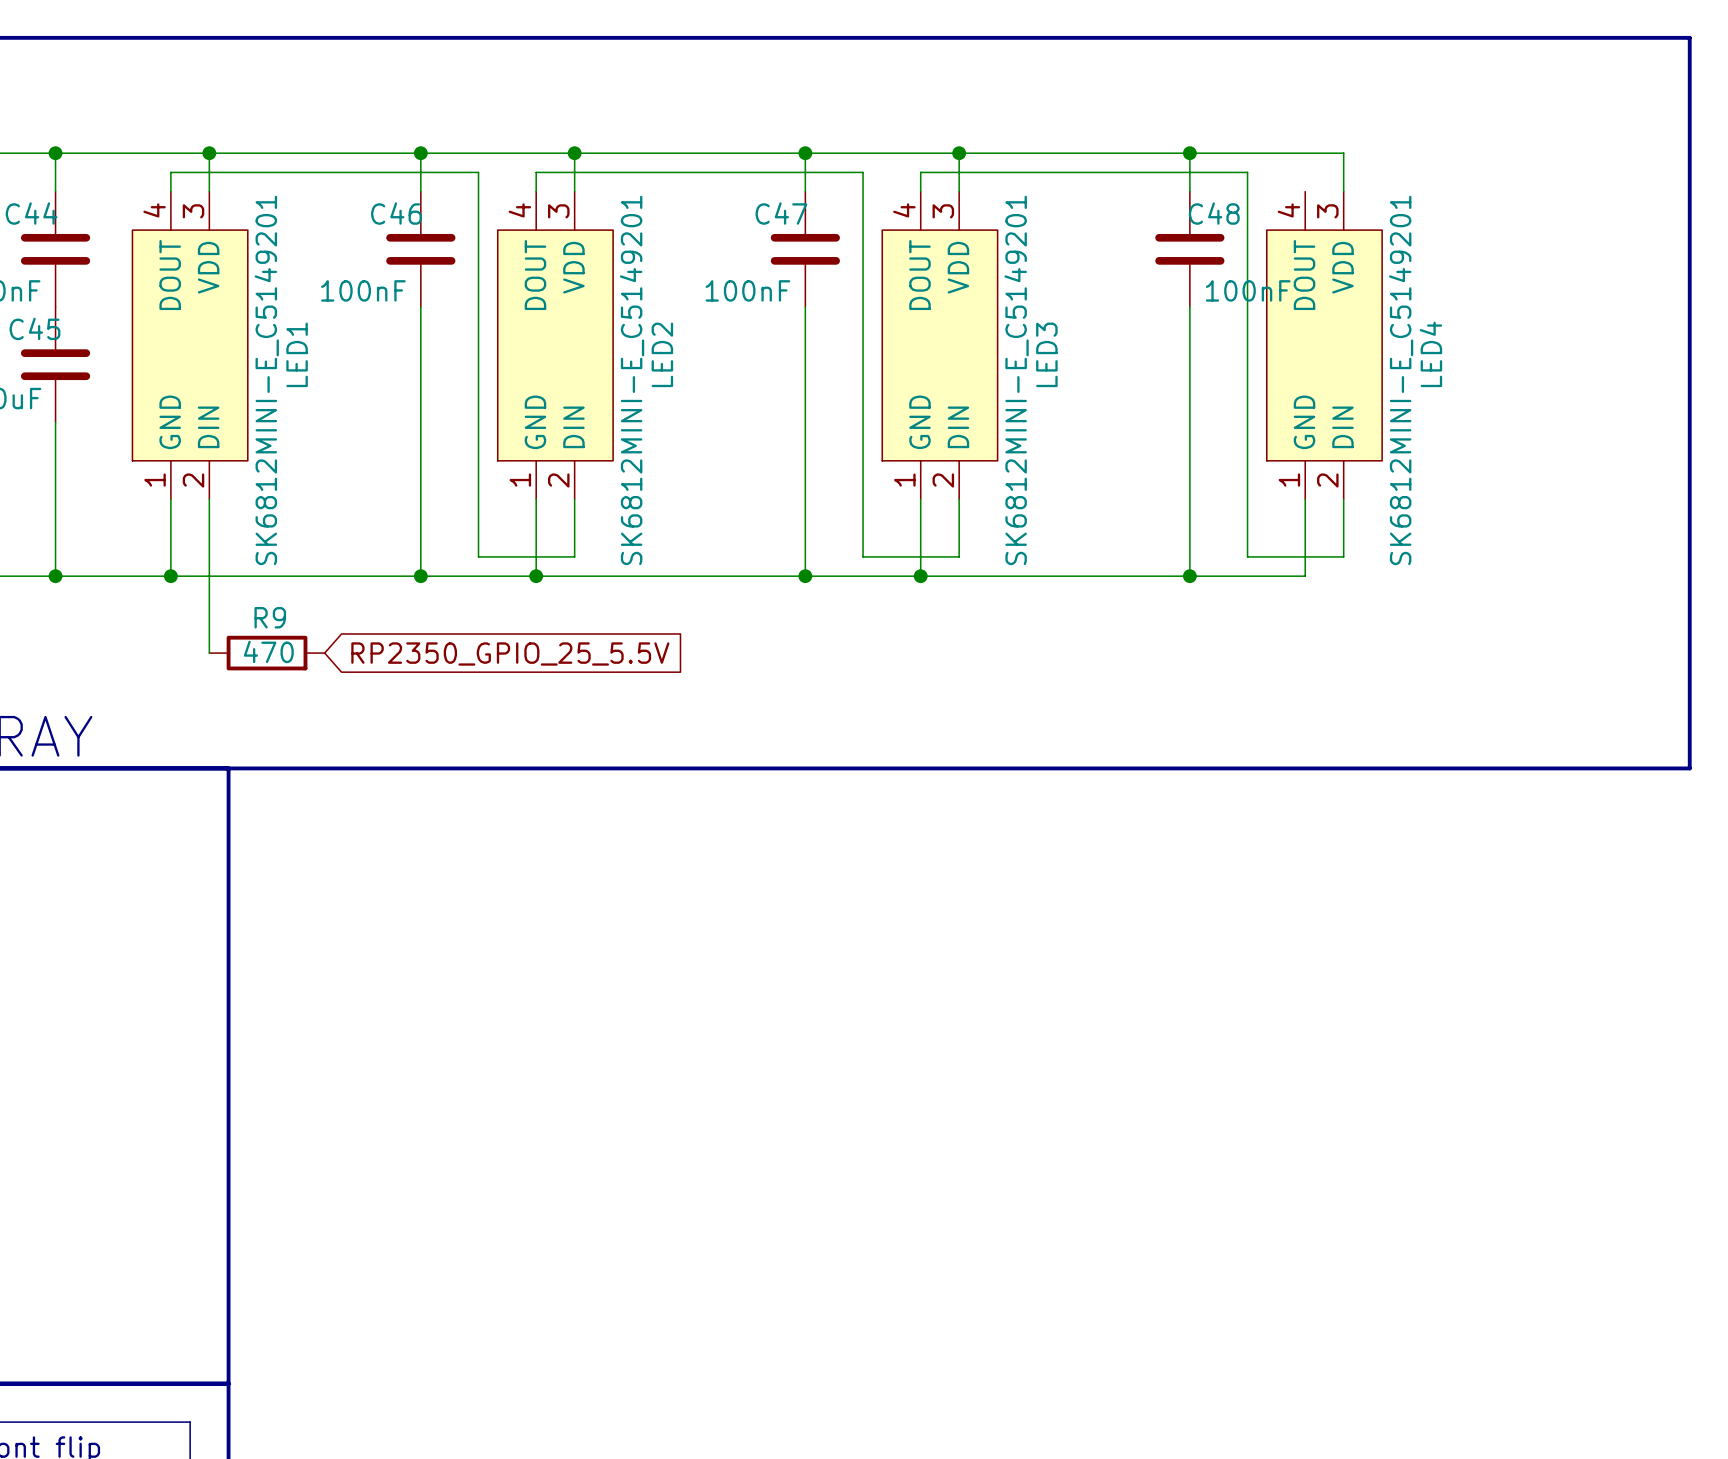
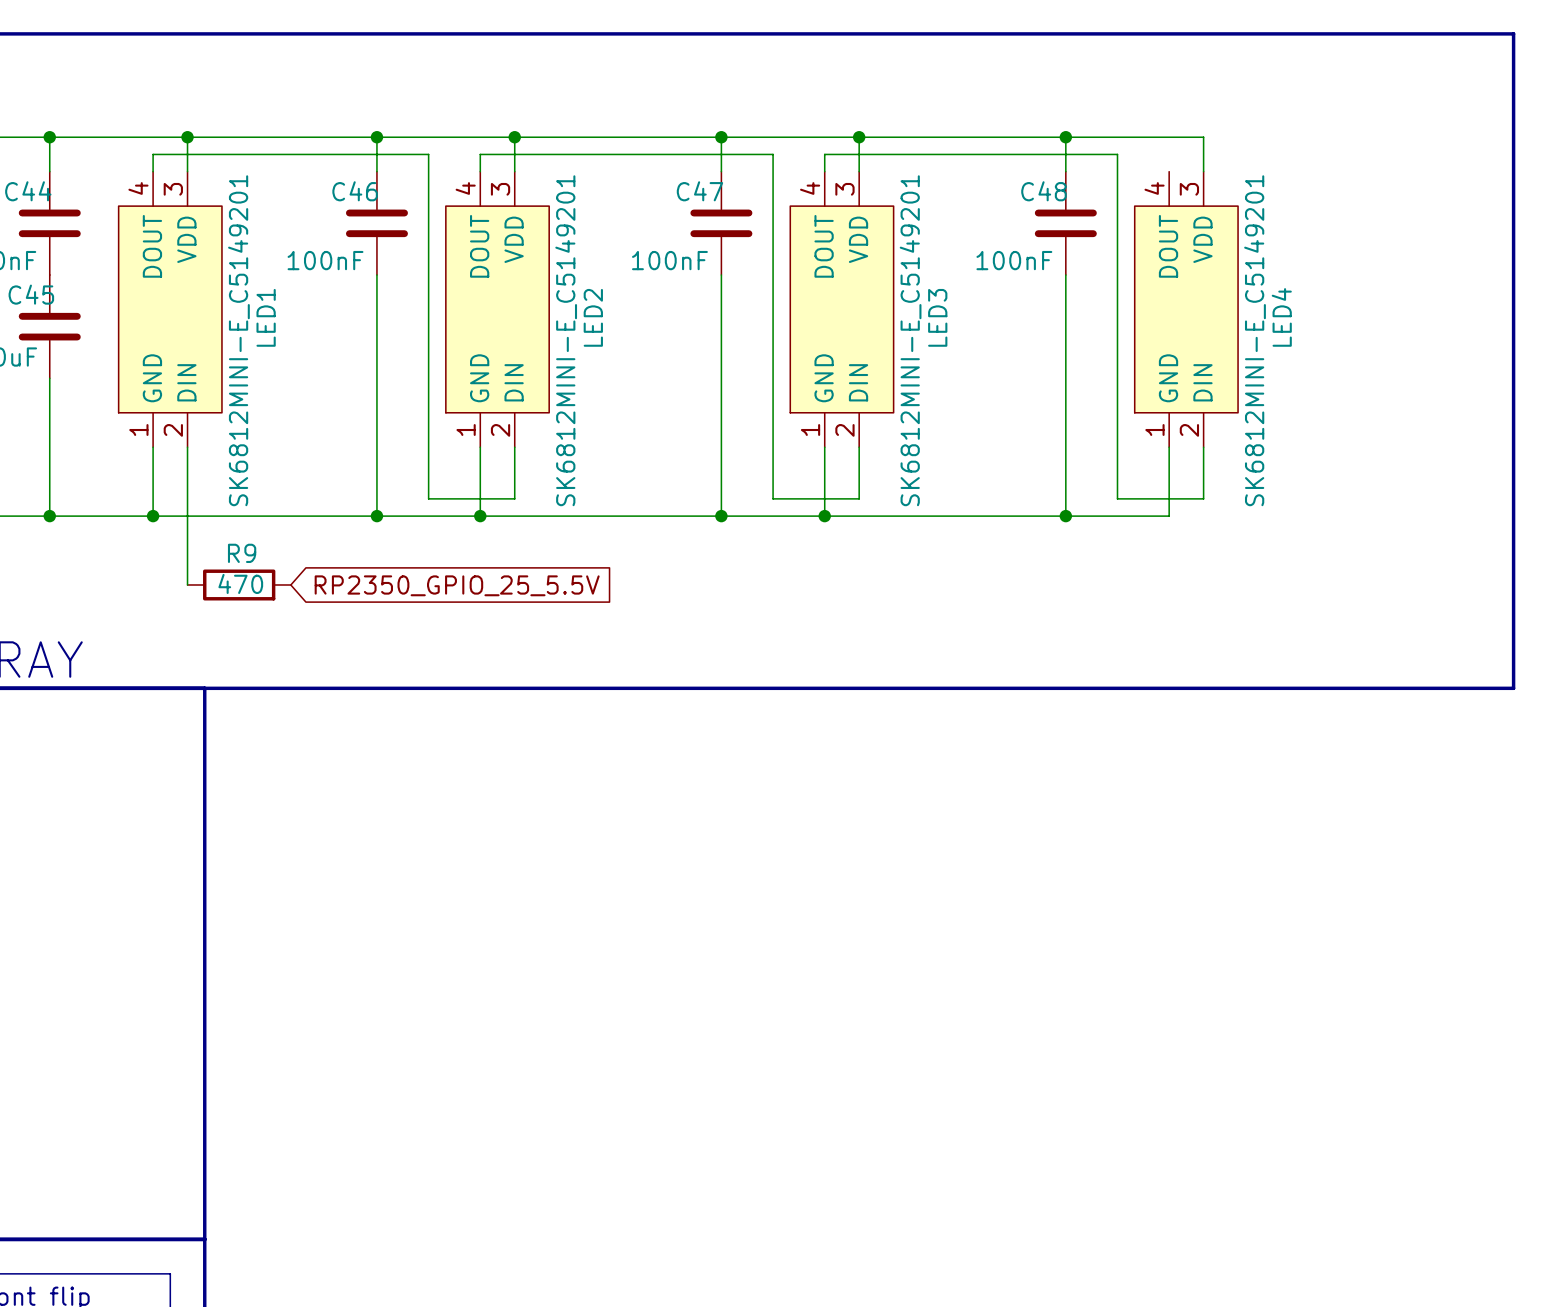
C48 name position: C48 (1214, 213) -> C48 (1043, 191)
C48 value position: 100nF (1248, 290) -> 100nF (1014, 260)

